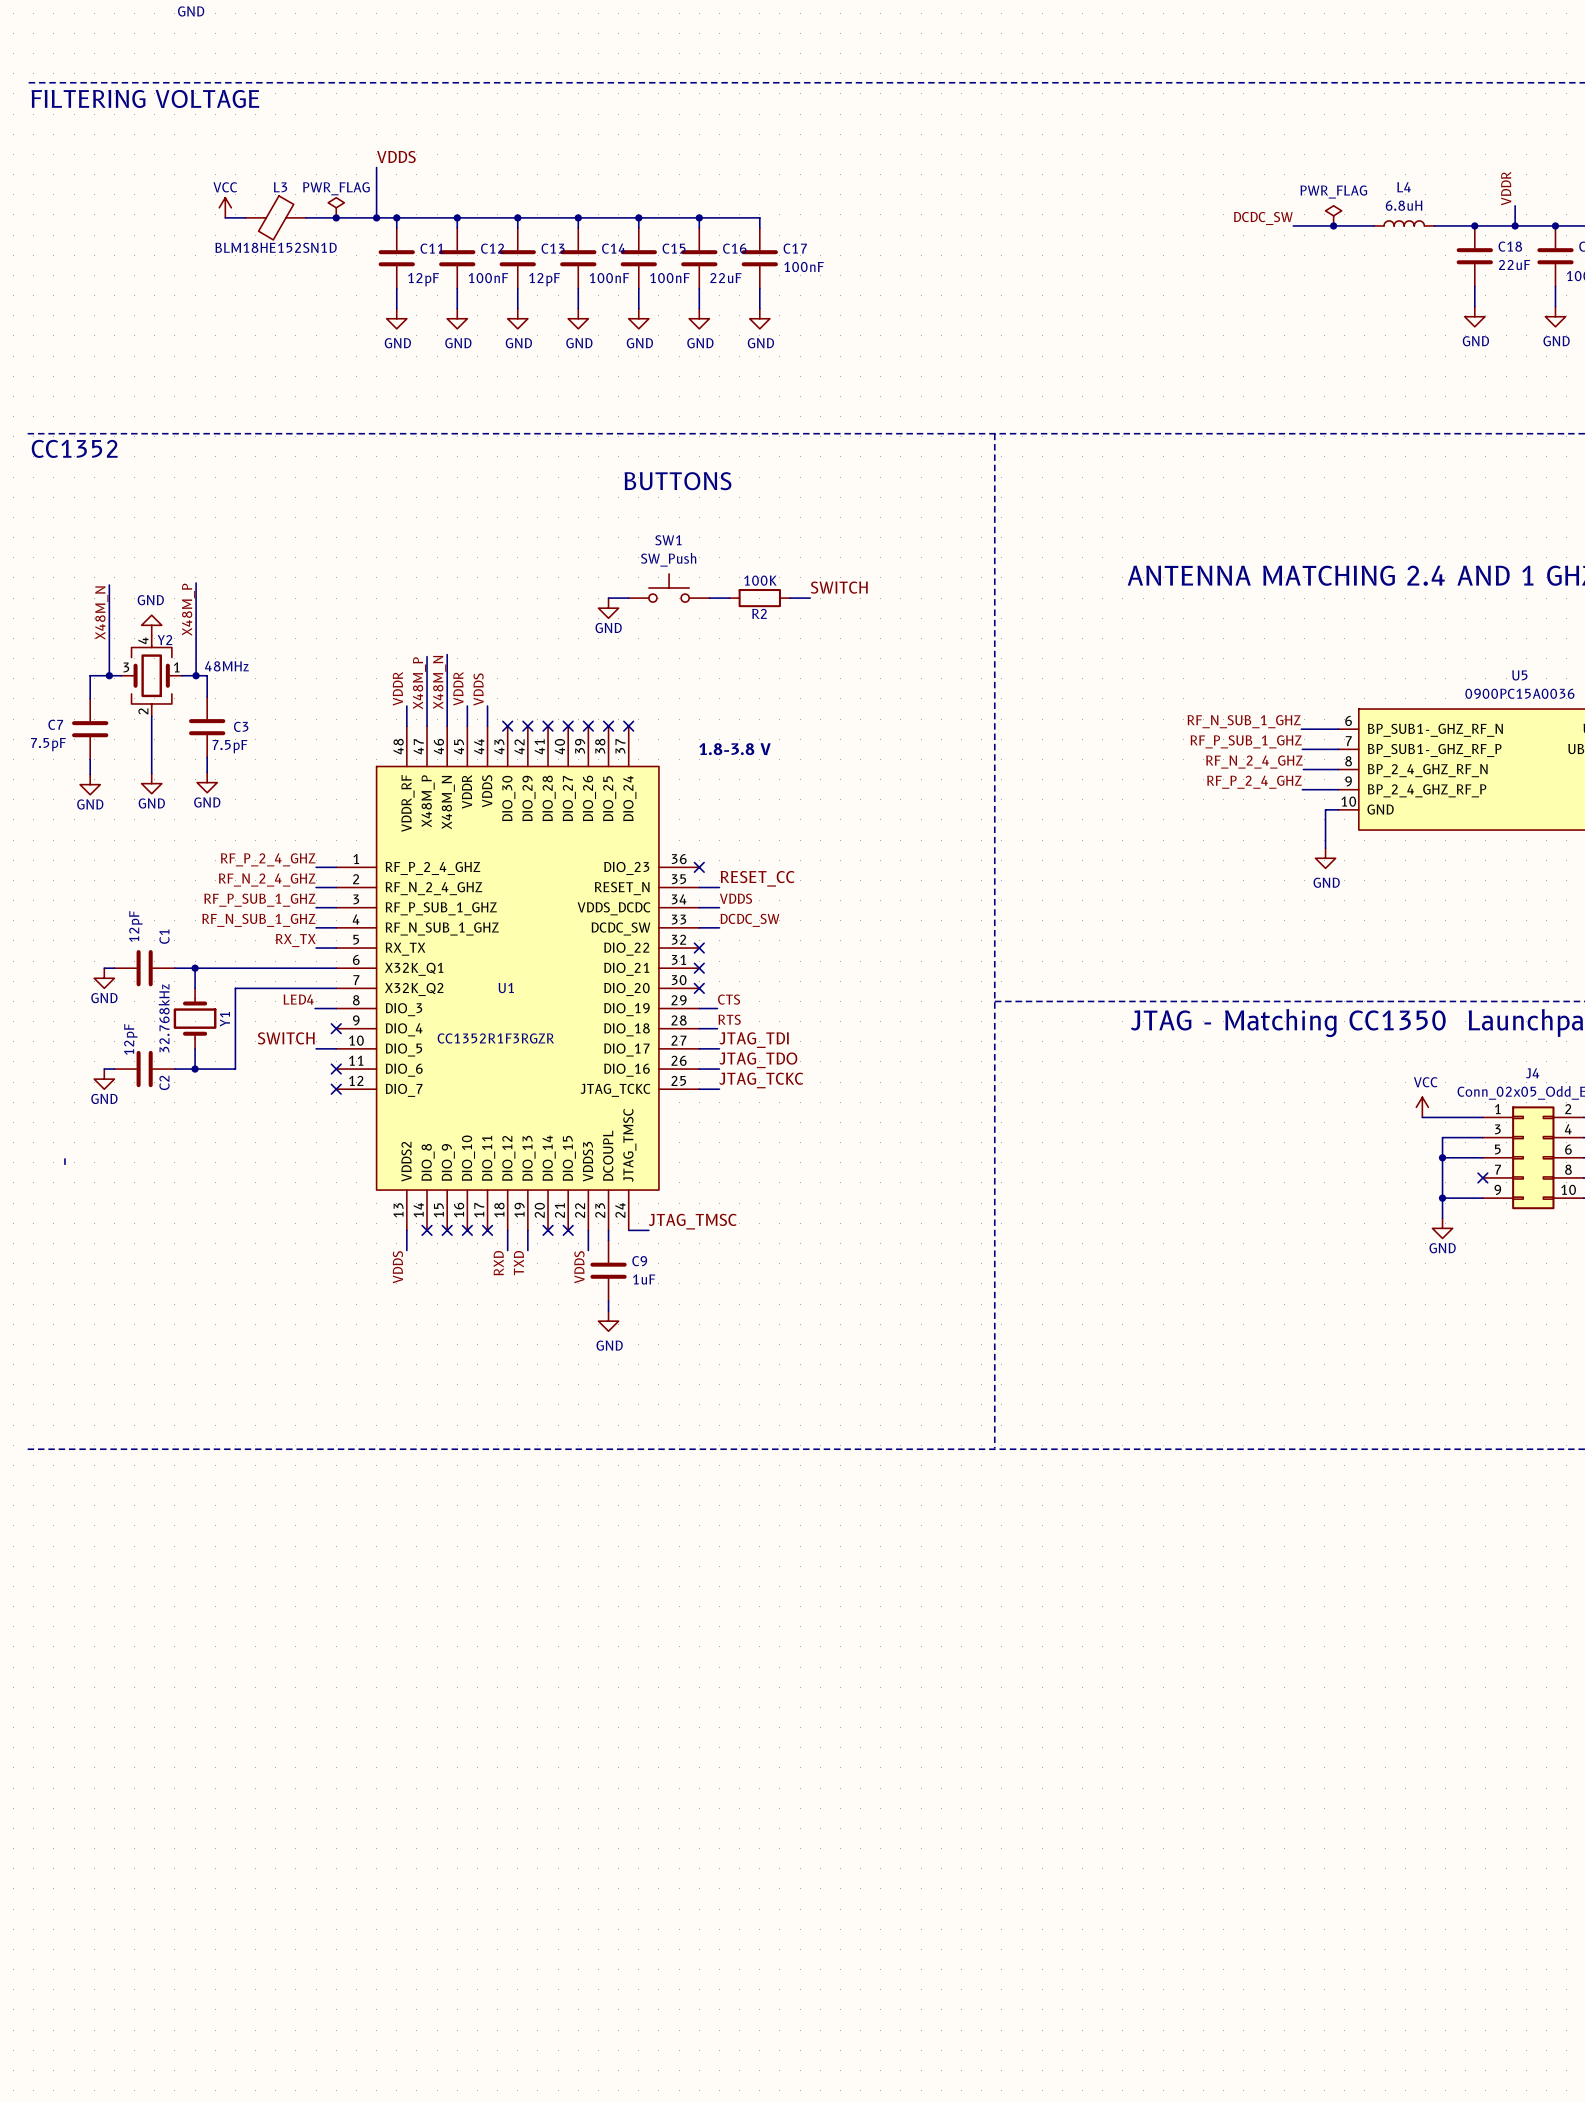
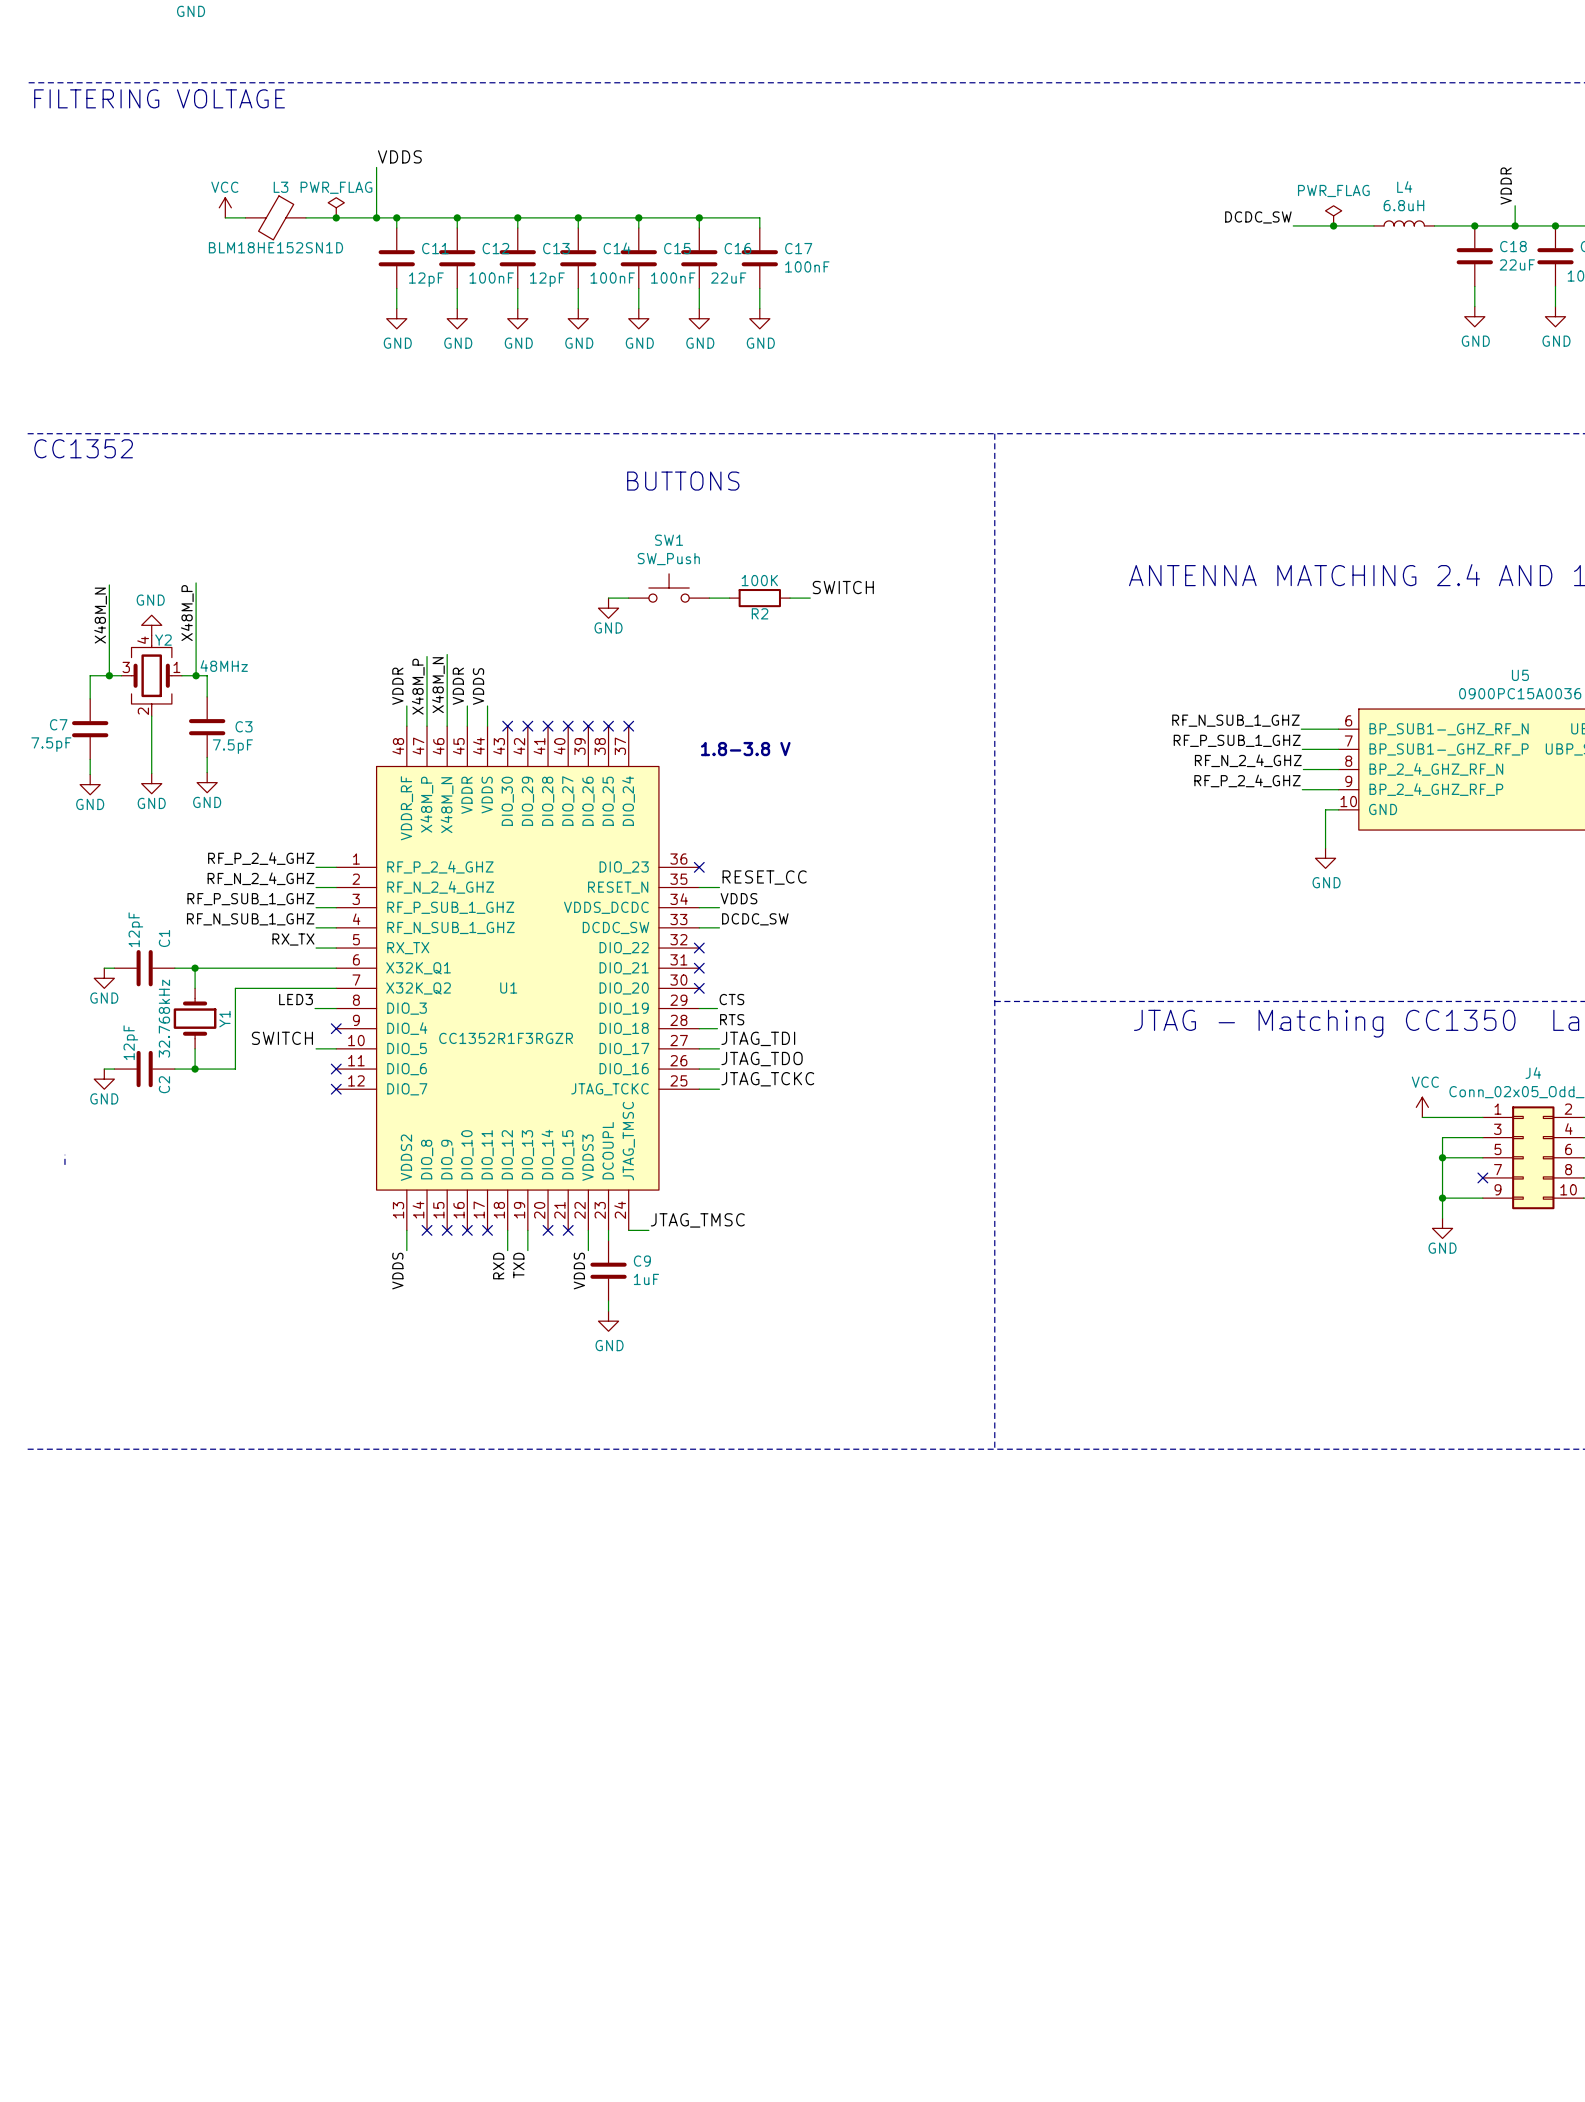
label: LED4 (298, 999) -> LED3 (296, 999)

